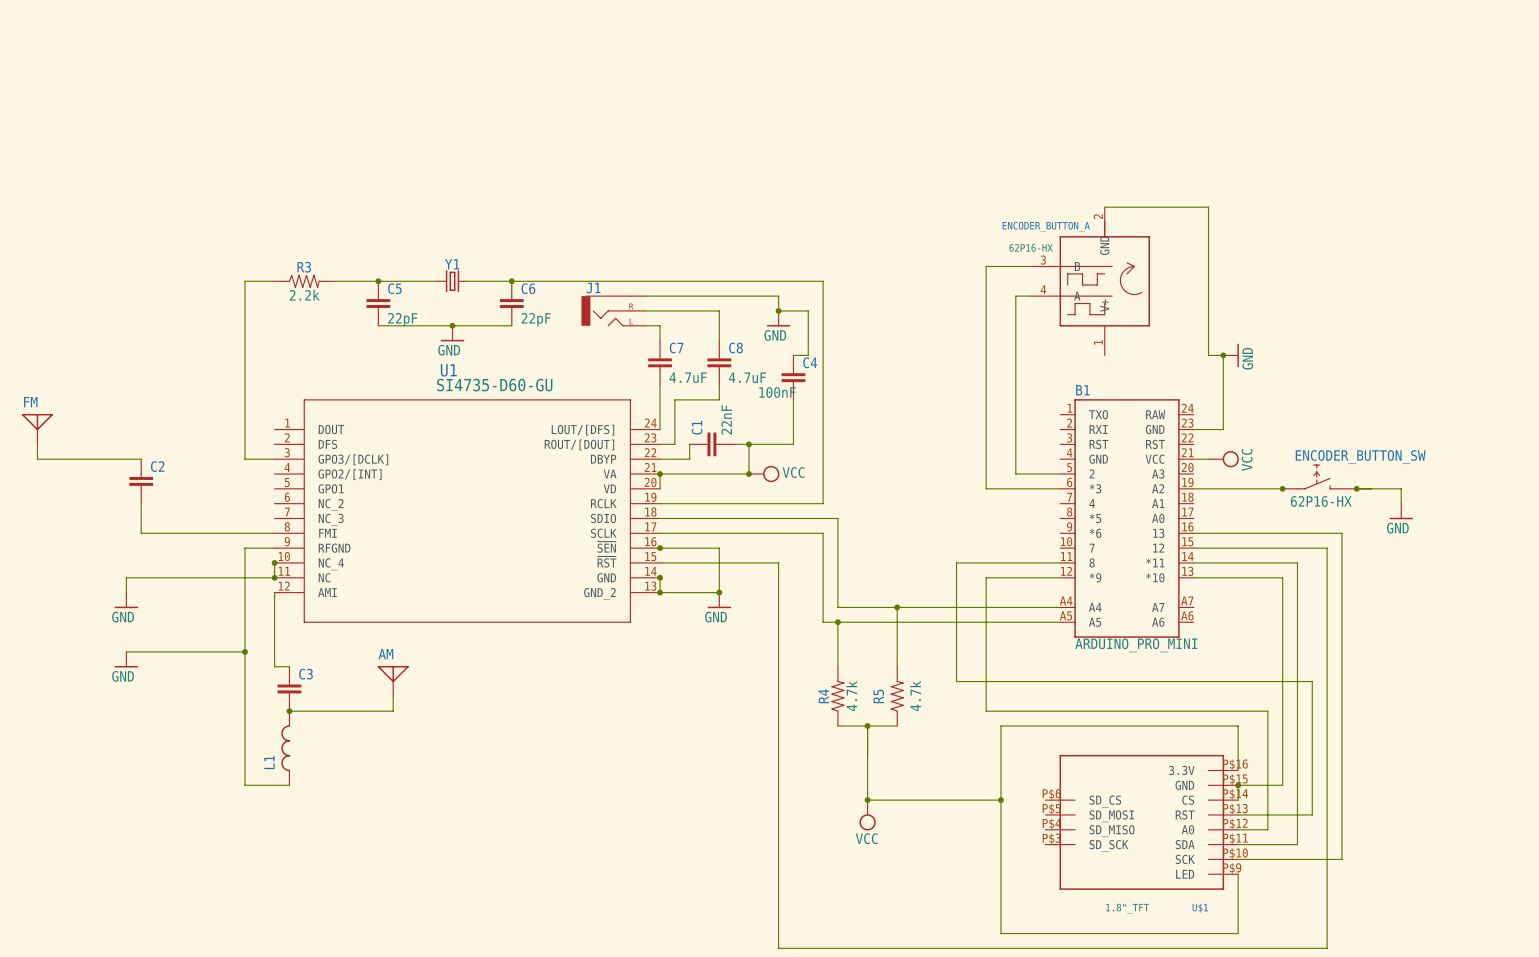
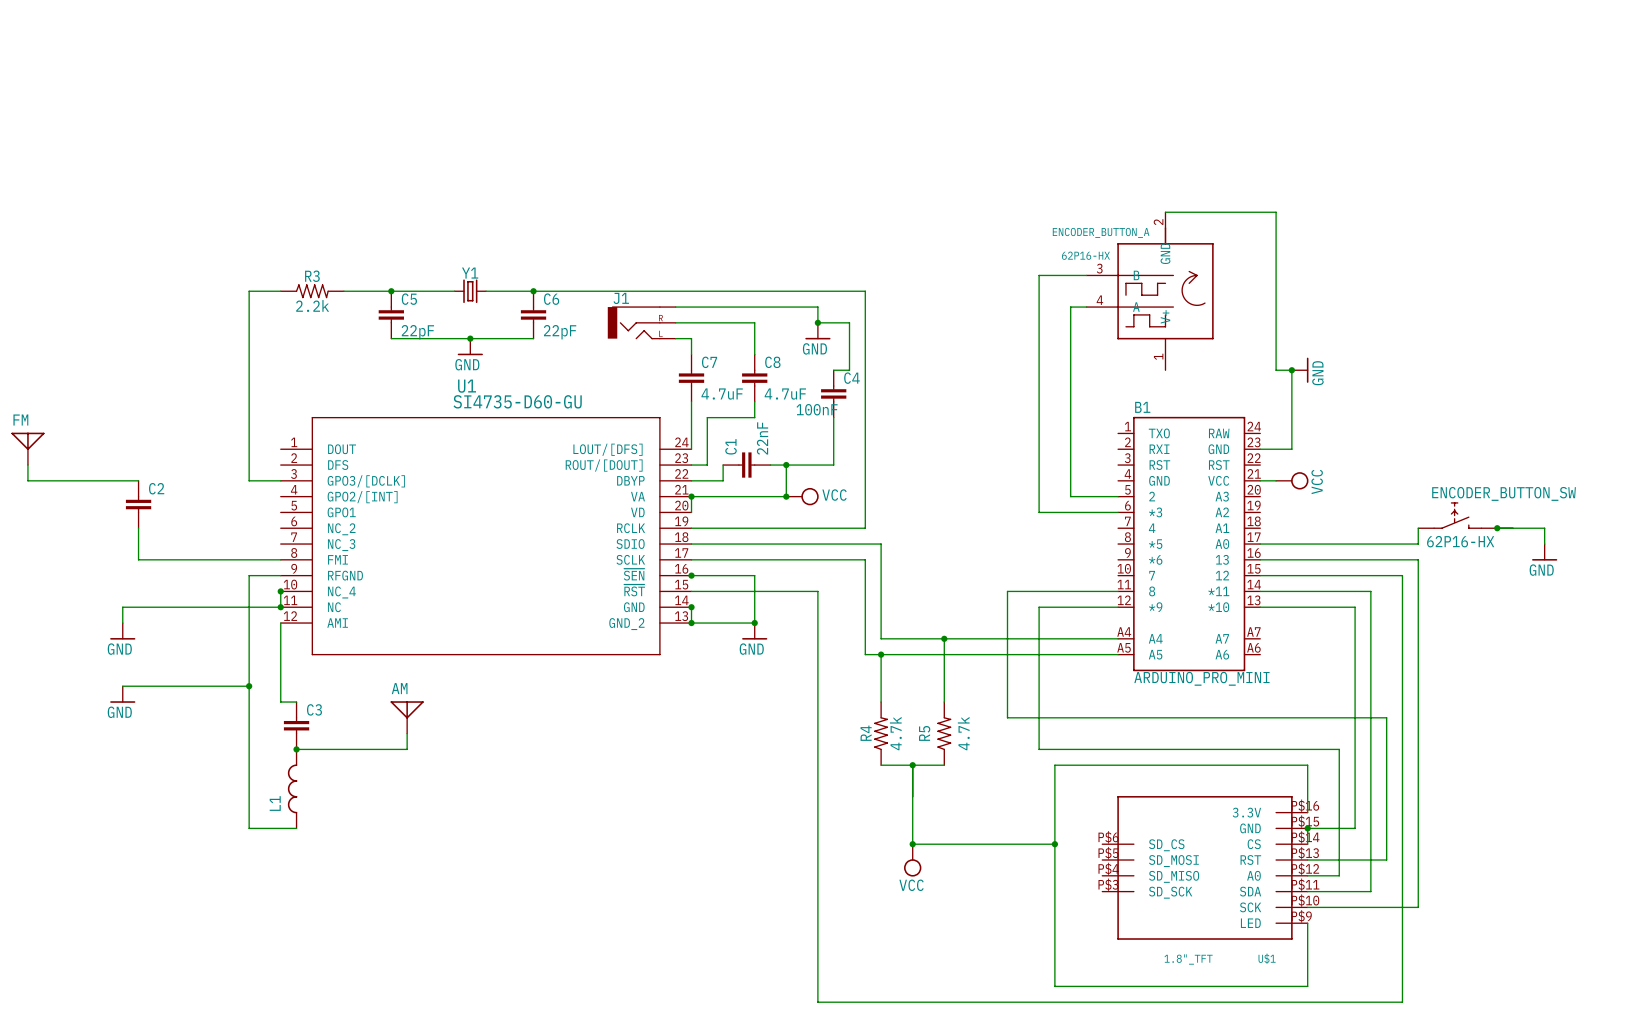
ENCODER_BUTTON_SW position: (1319, 476) -> (1457, 515)
wire: (1193, 488) (1282, 488) -> none
junction: (1282, 488) -> none
wire: (1356, 488) (1401, 488) (1401, 503) -> (1497, 528) (1544, 528) (1544, 544)
junction: (1356, 488) -> none
wire: none -> (1418, 528) (1418, 544) (1260, 544)
junction: none -> (1497, 528)
power symbol position: GND (1401, 511) -> GND (1544, 552)

